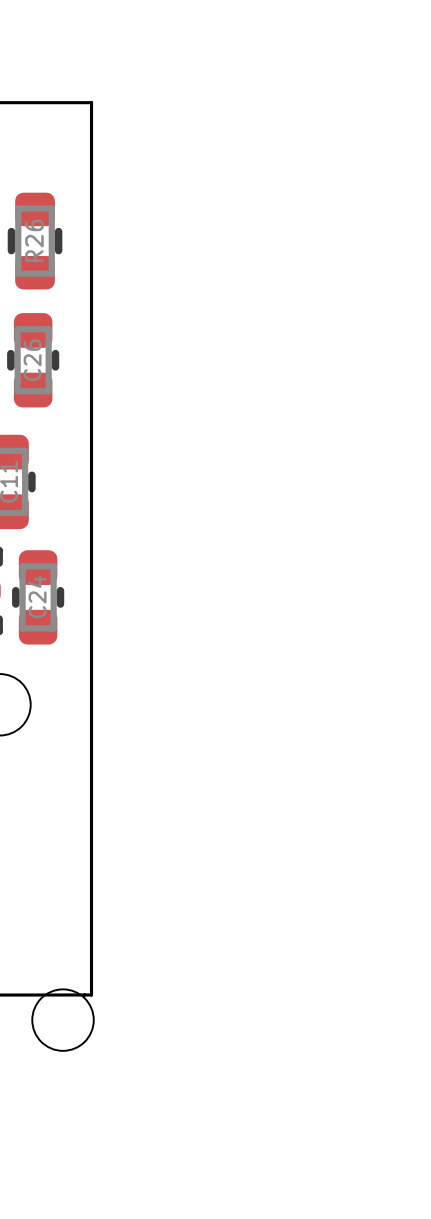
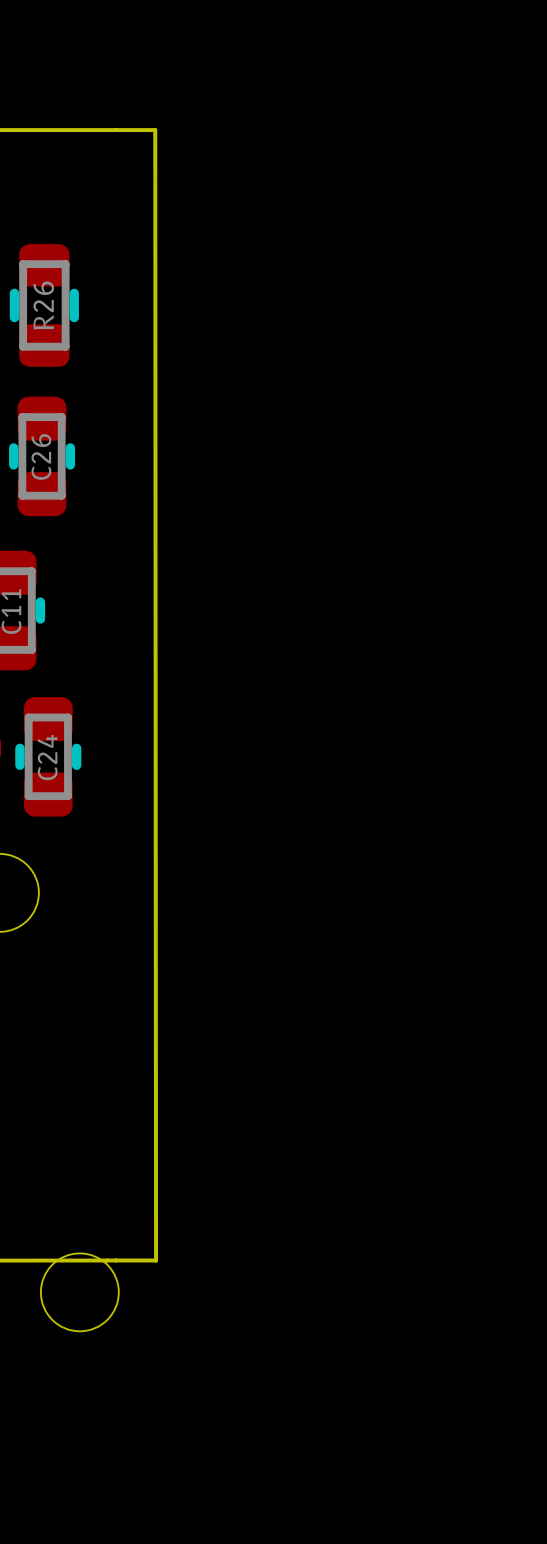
board edge: (91, 102) (91, 994) -> (115, 130) (155, 130) (156, 1260) (115, 1260)

